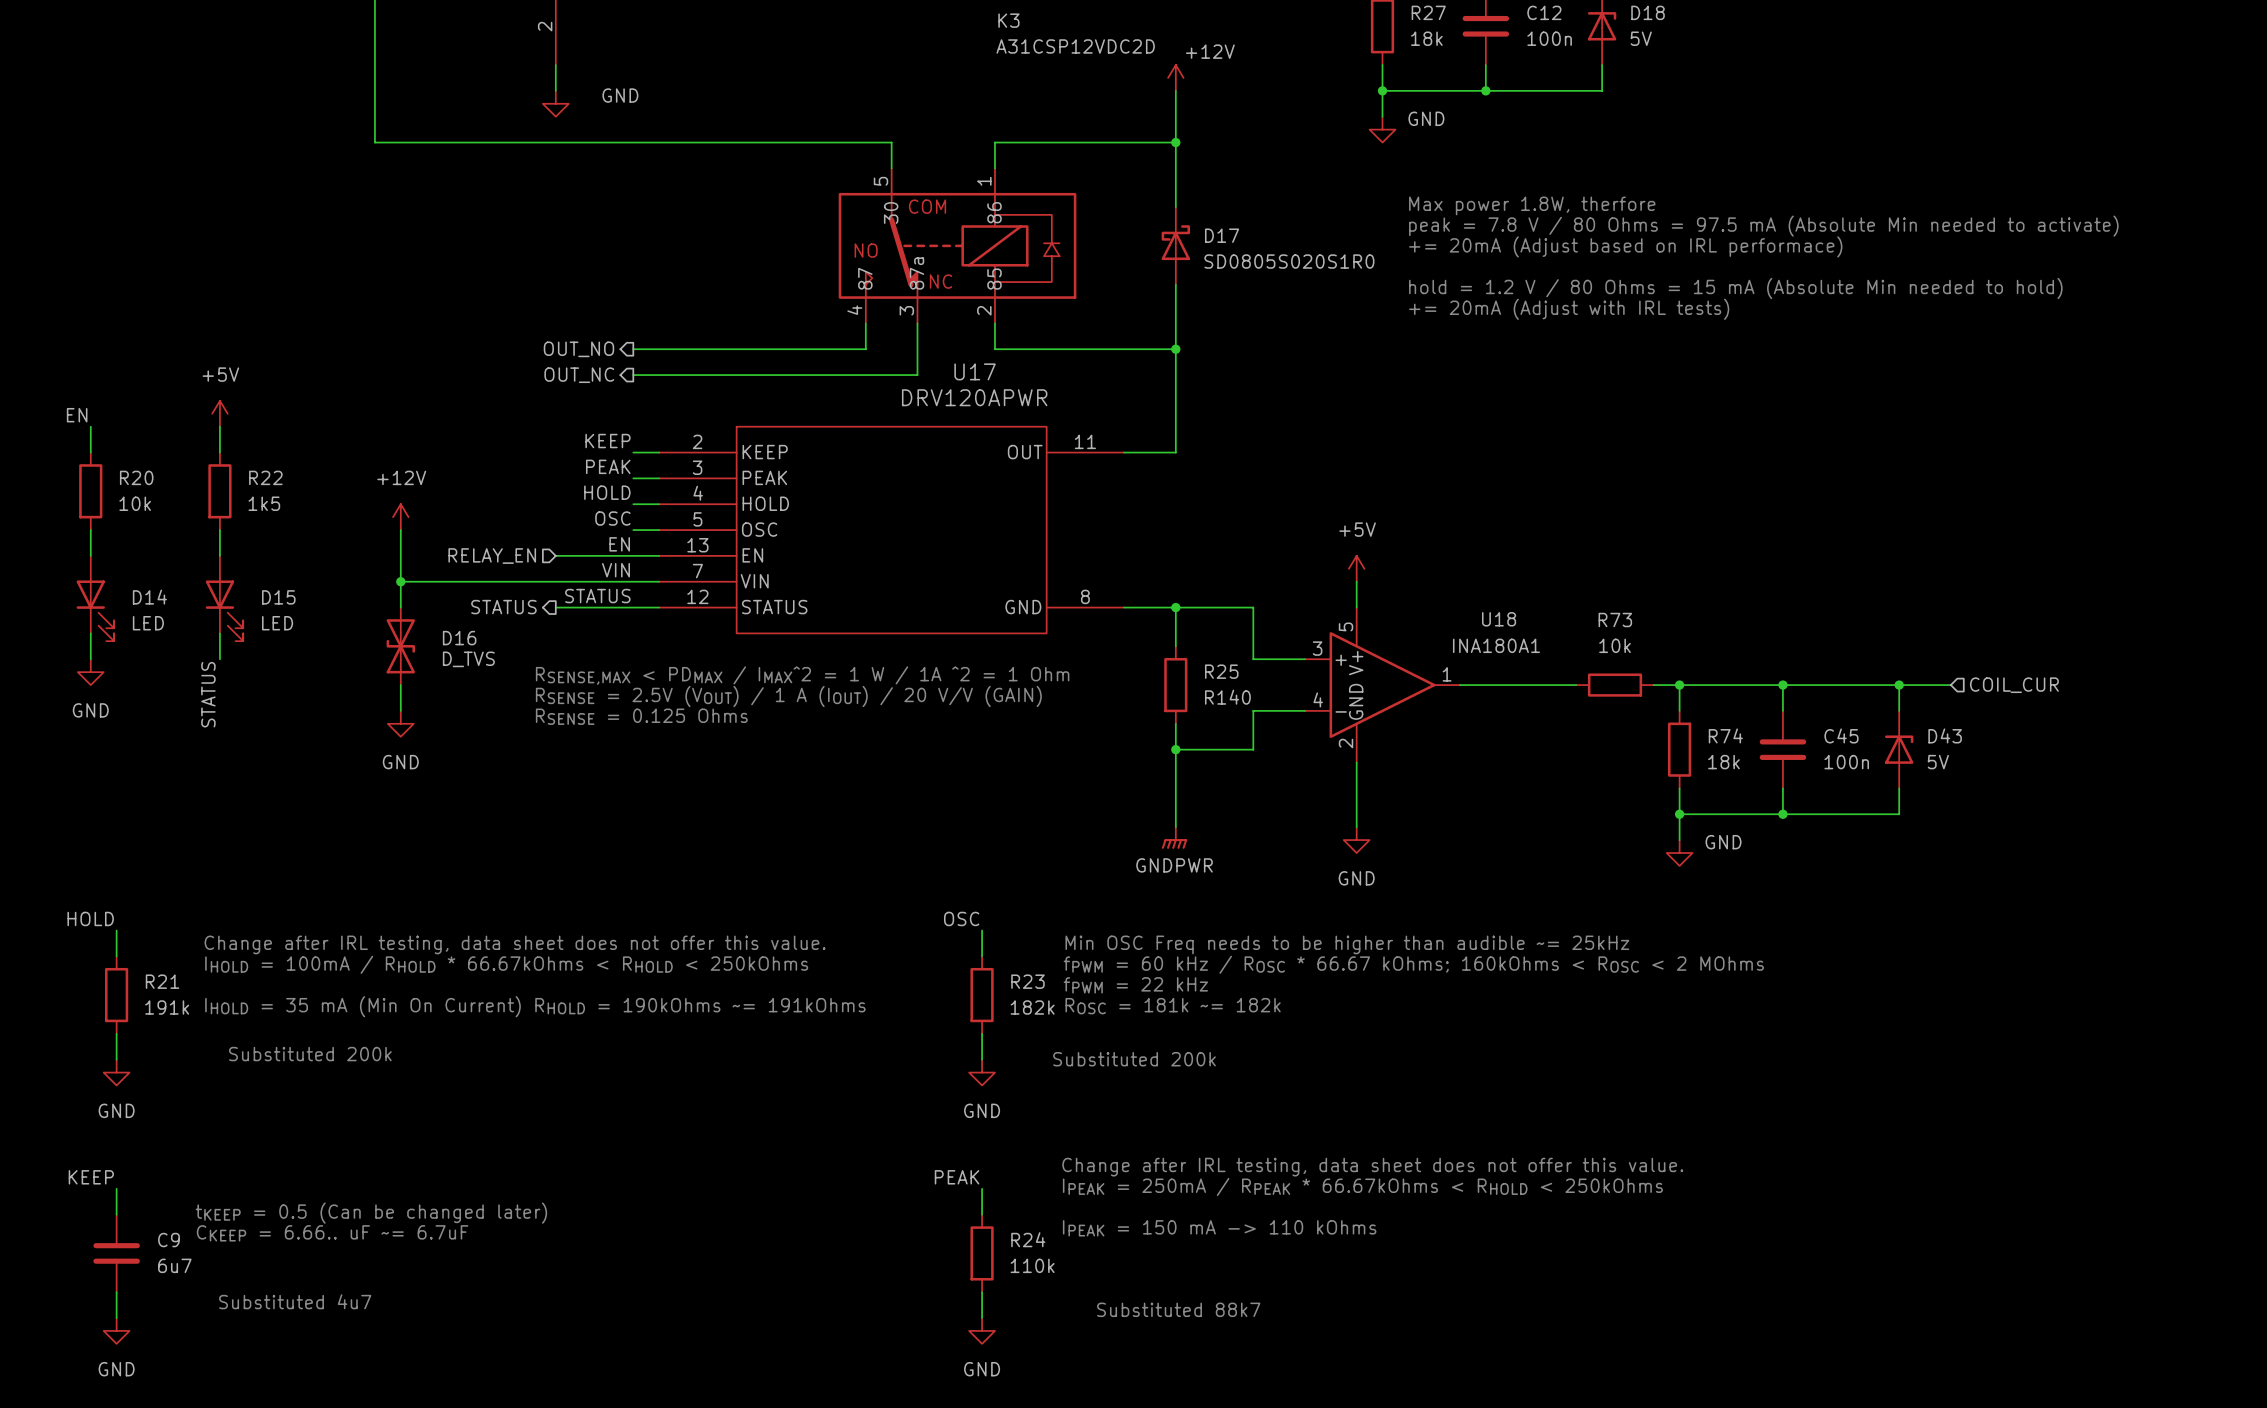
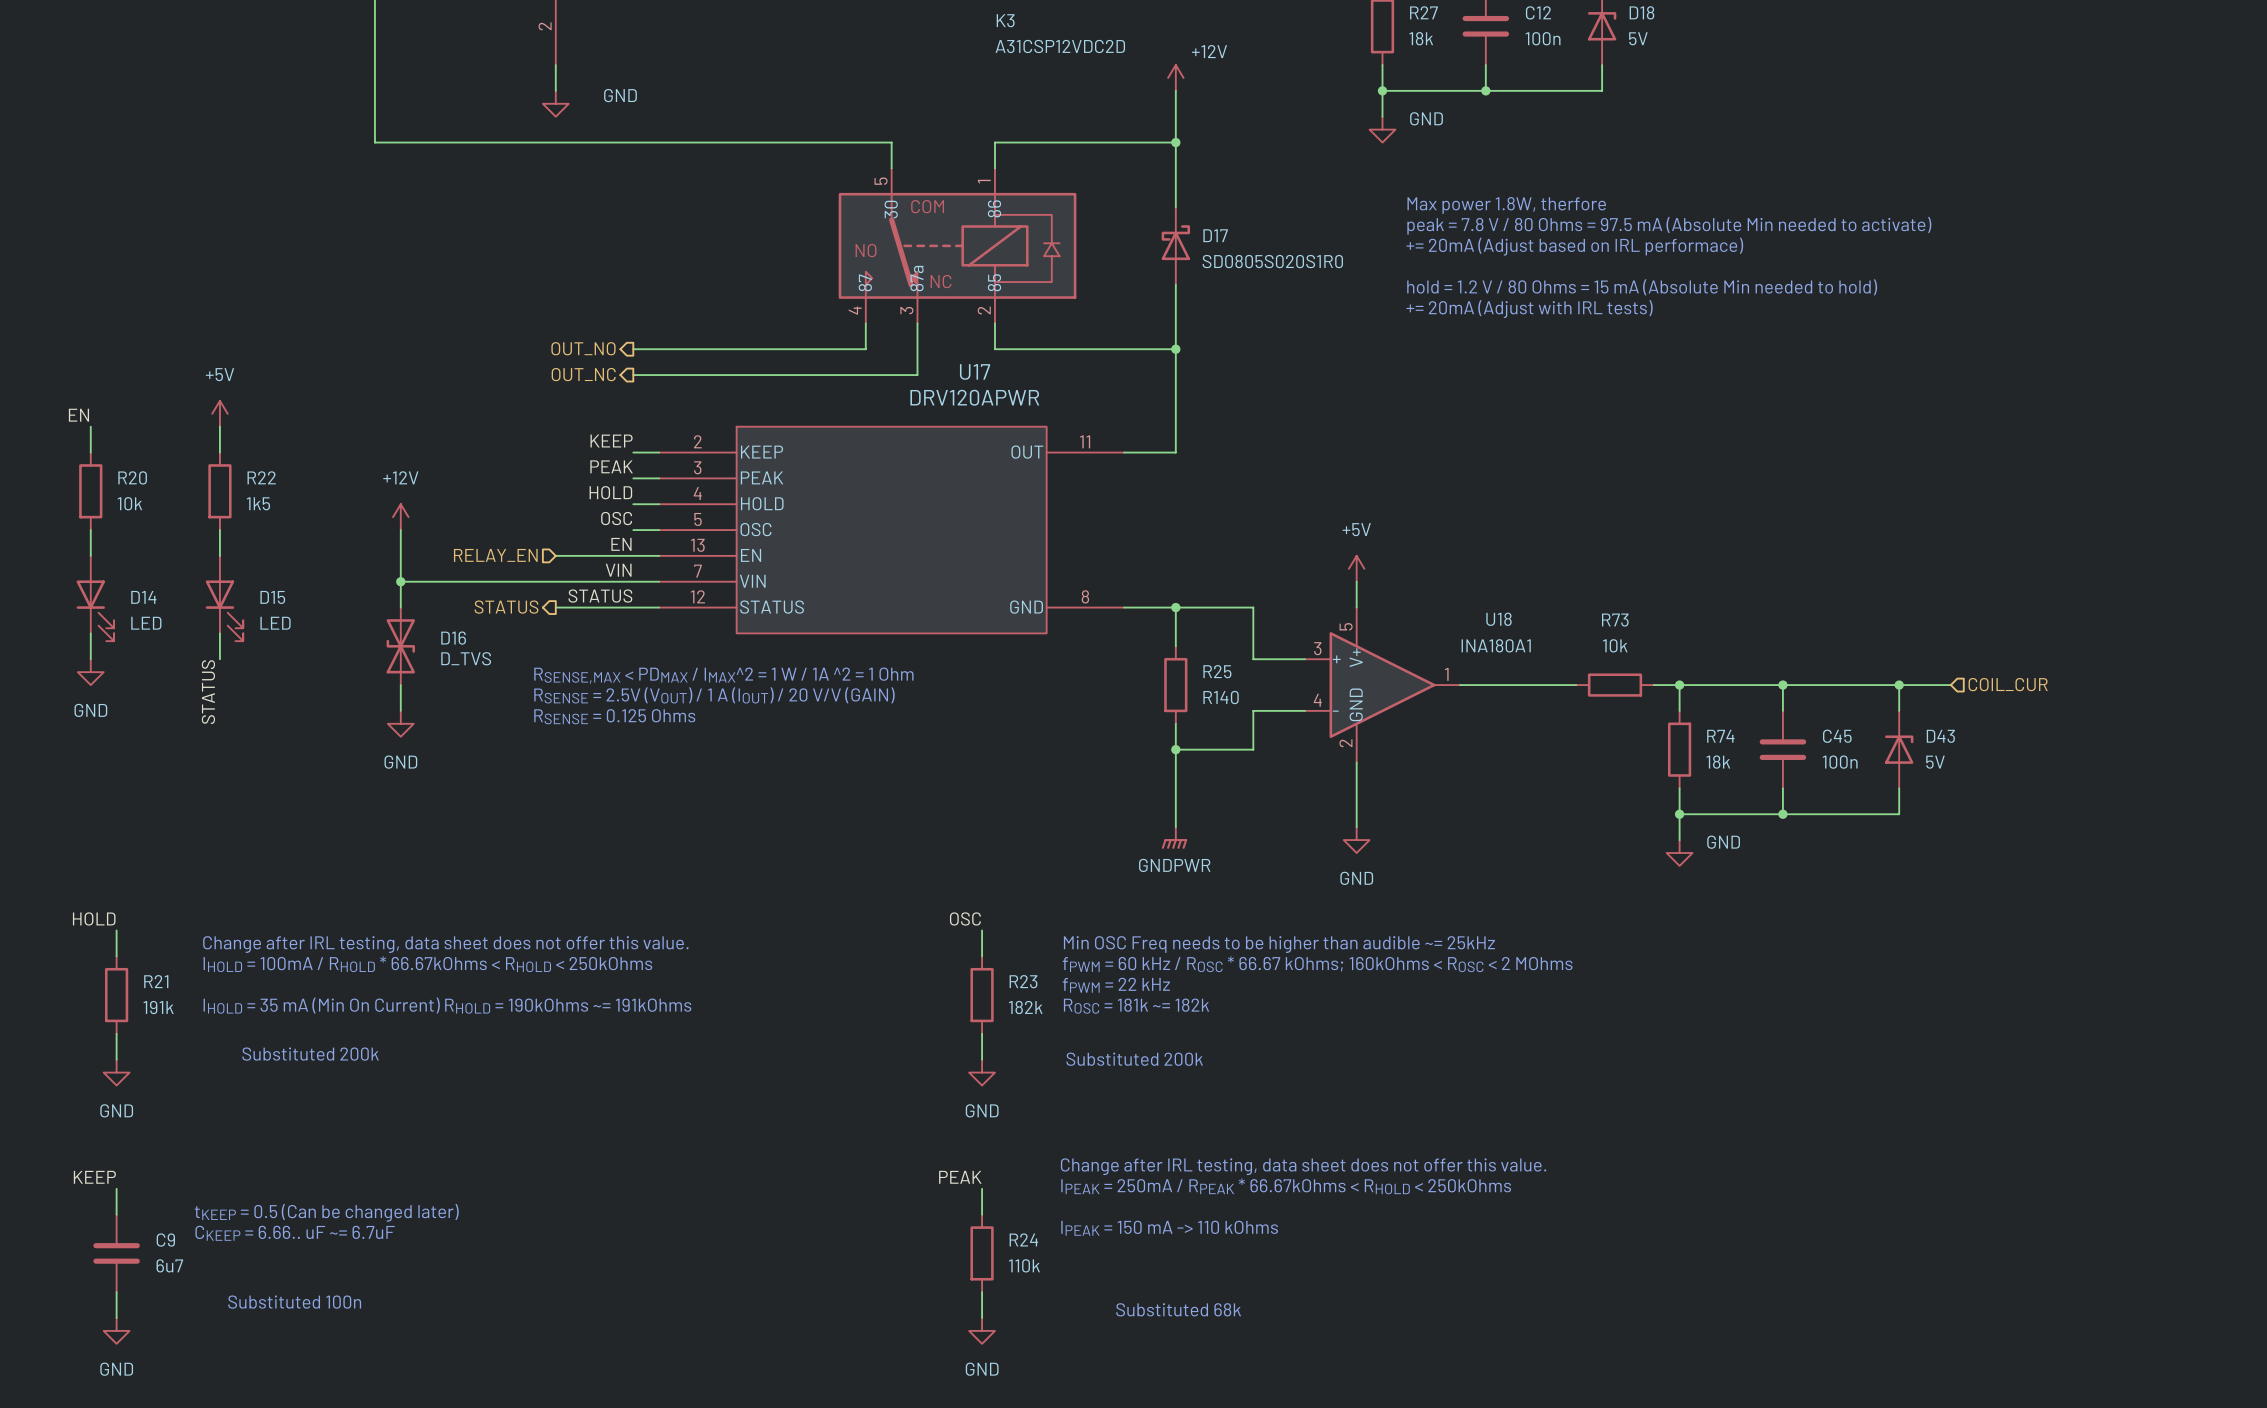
text: Substituted 4u7 (295, 1301) -> Substituted 100n (294, 1302)
text: Substituted 88k7 (1178, 1309) -> Substituted 68k (1178, 1309)

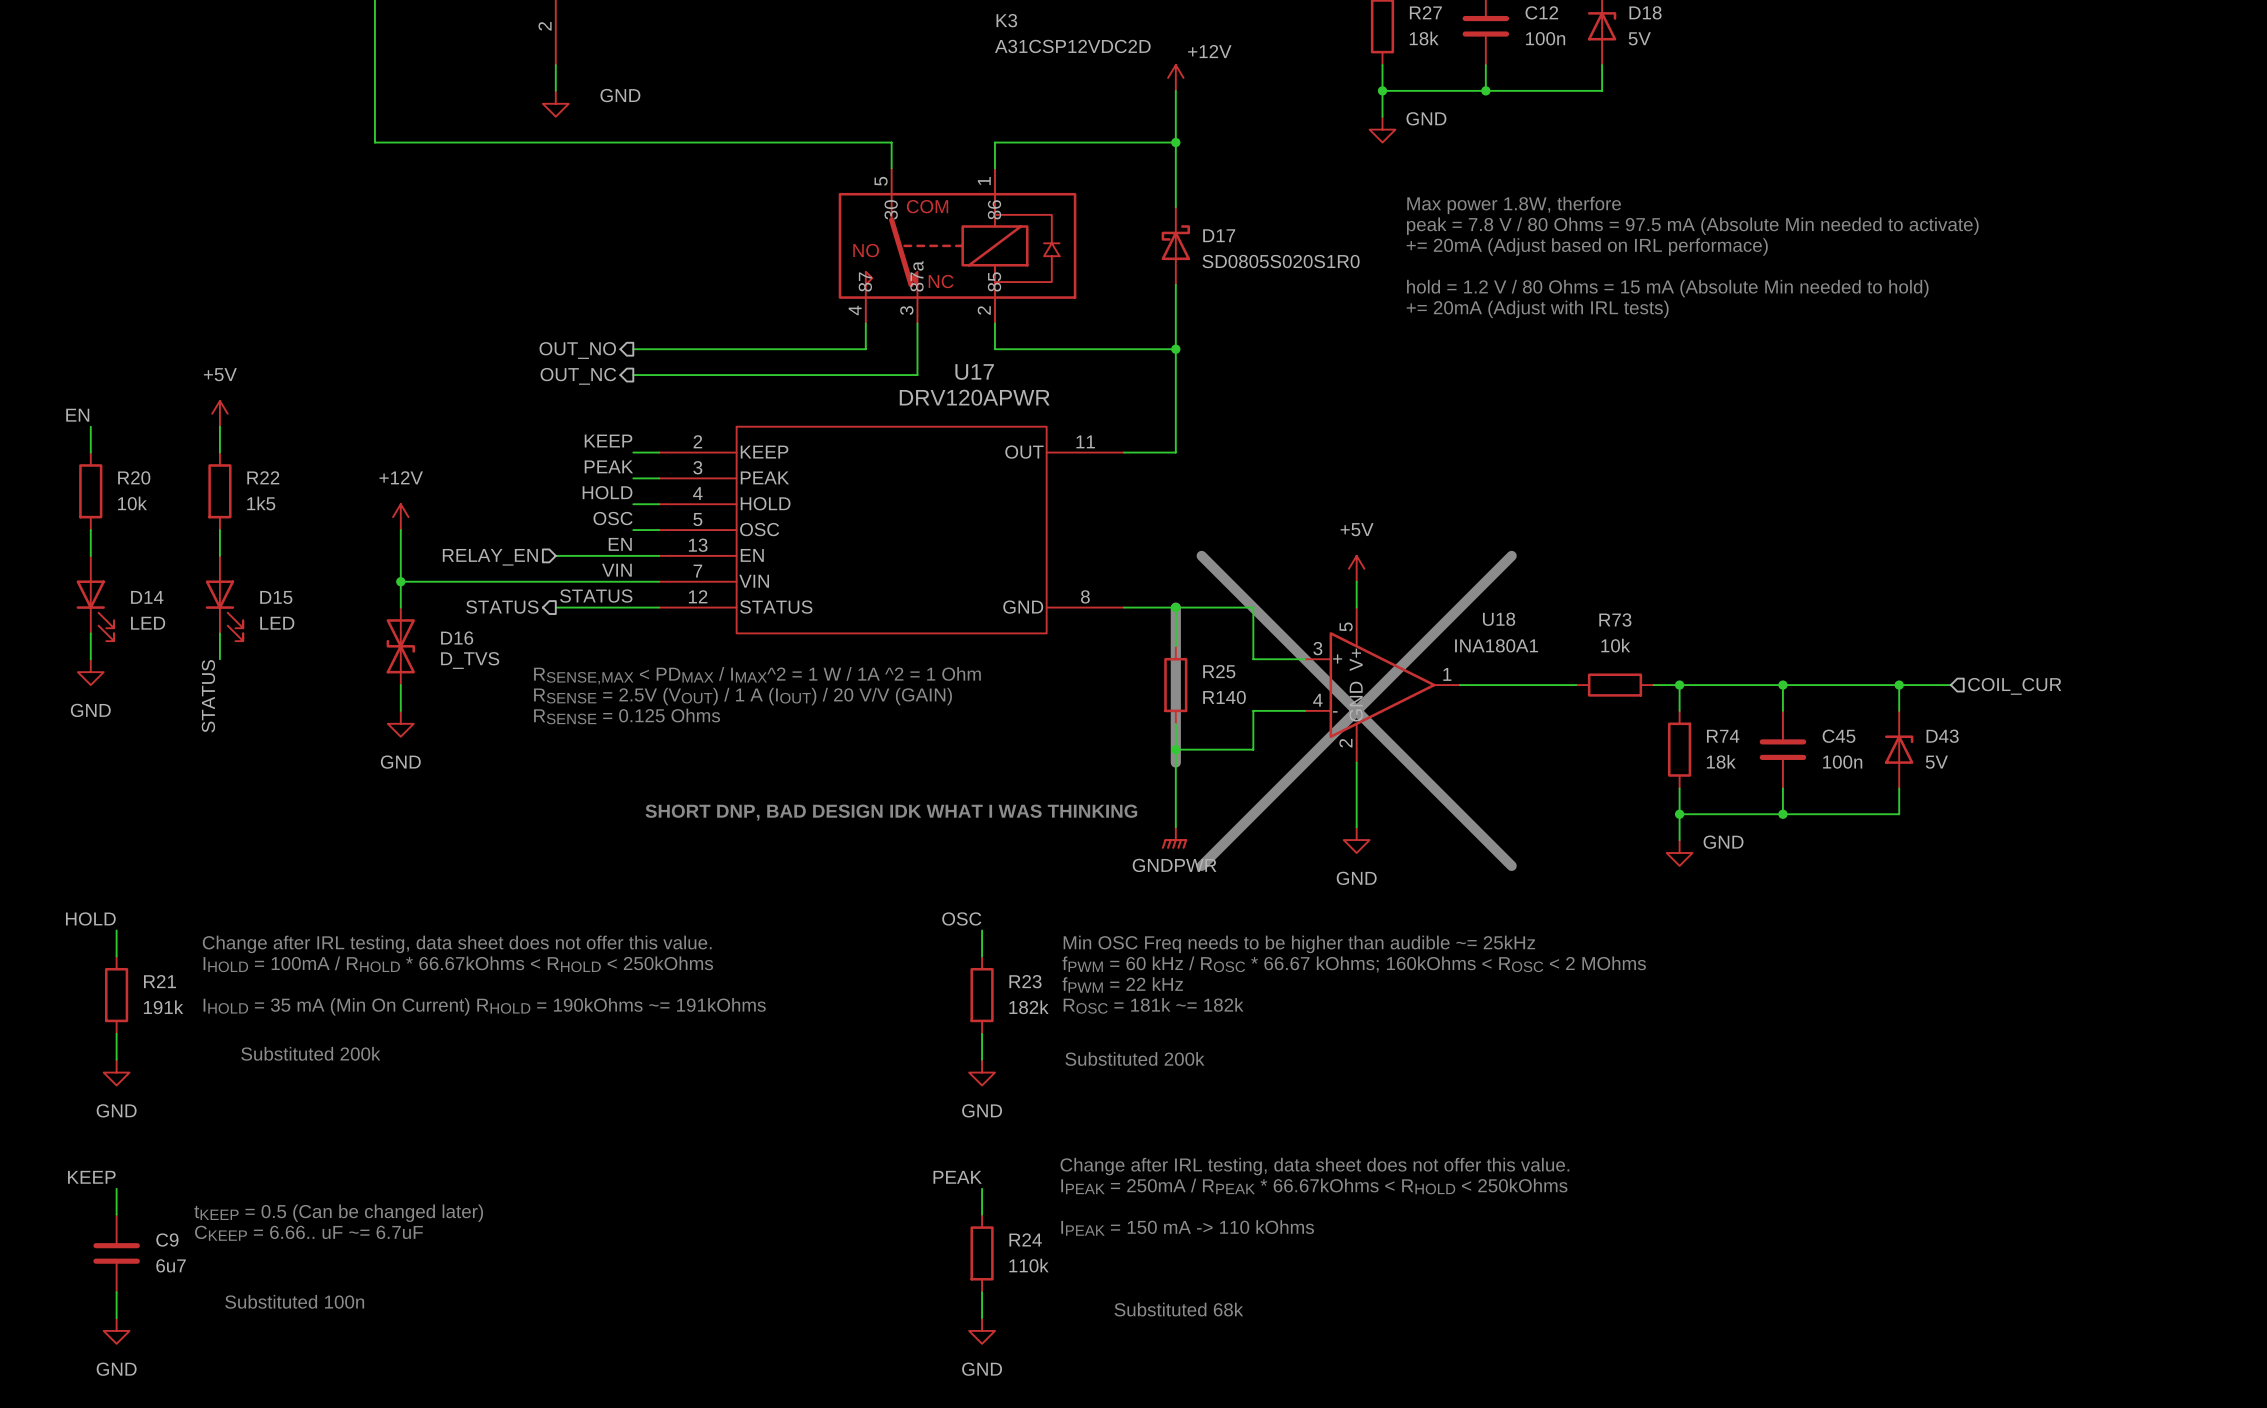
line: none -> (1201, 555) (1511, 865)
line: none -> (1511, 555) (1201, 865)
line: none -> (1175, 607) (1175, 762)
text: none -> SHORT DNP, BAD DESIGN IDK WHAT I WAS THINKING (891, 812)

